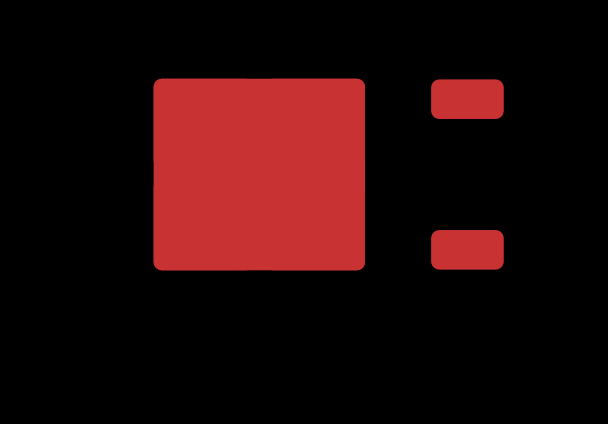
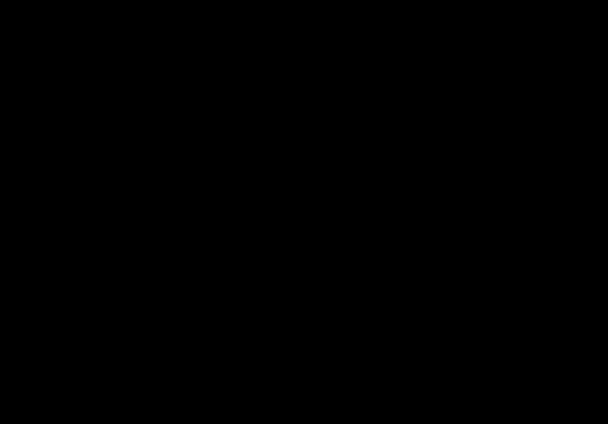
part: (328, 174) -> none

